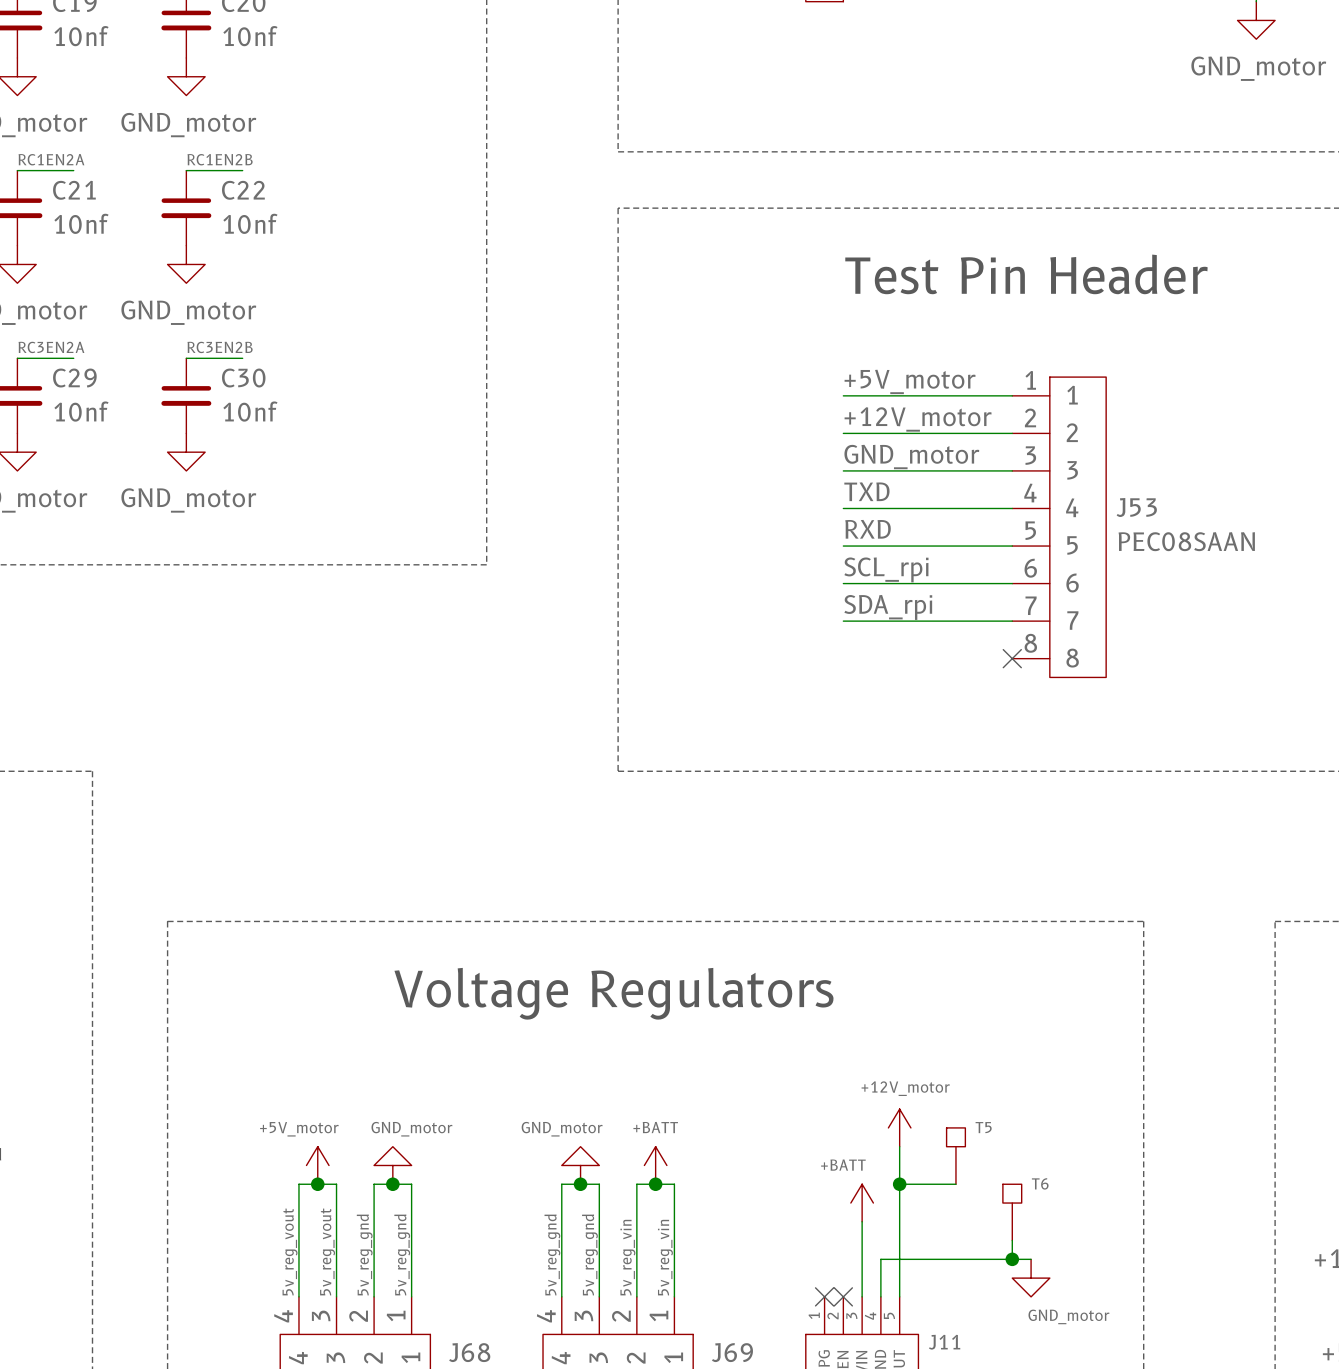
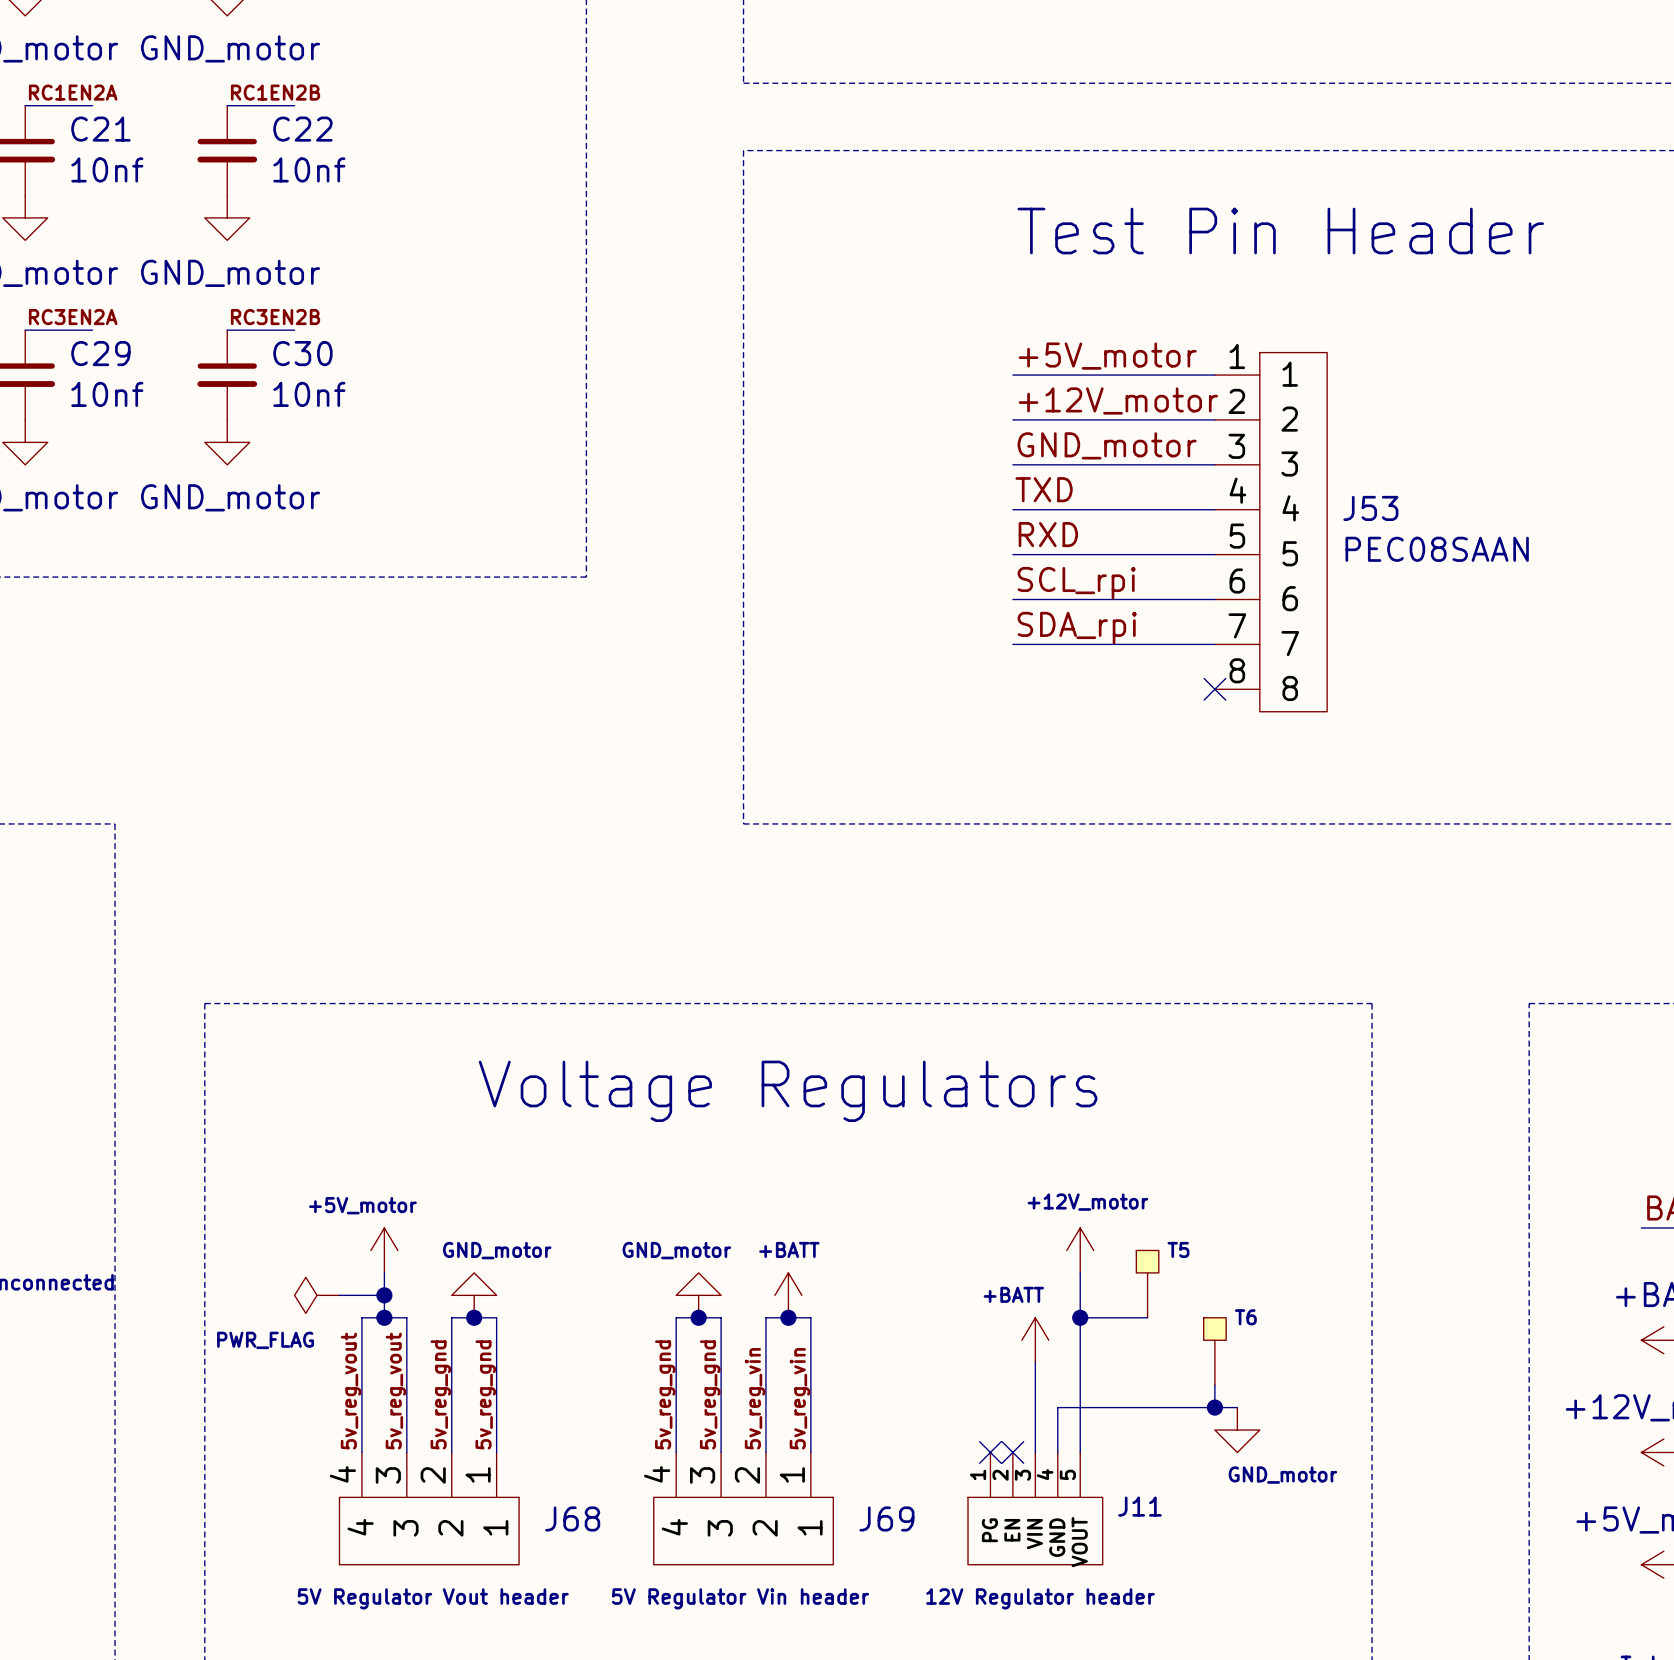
power symbol: none -> PWR_FLAG (317, 1295)
wire: none -> (339, 1295) (384, 1295)
power symbol position: +5V_motor (317, 1165) -> +5V_motor (384, 1250)
junction: none -> (384, 1295)

